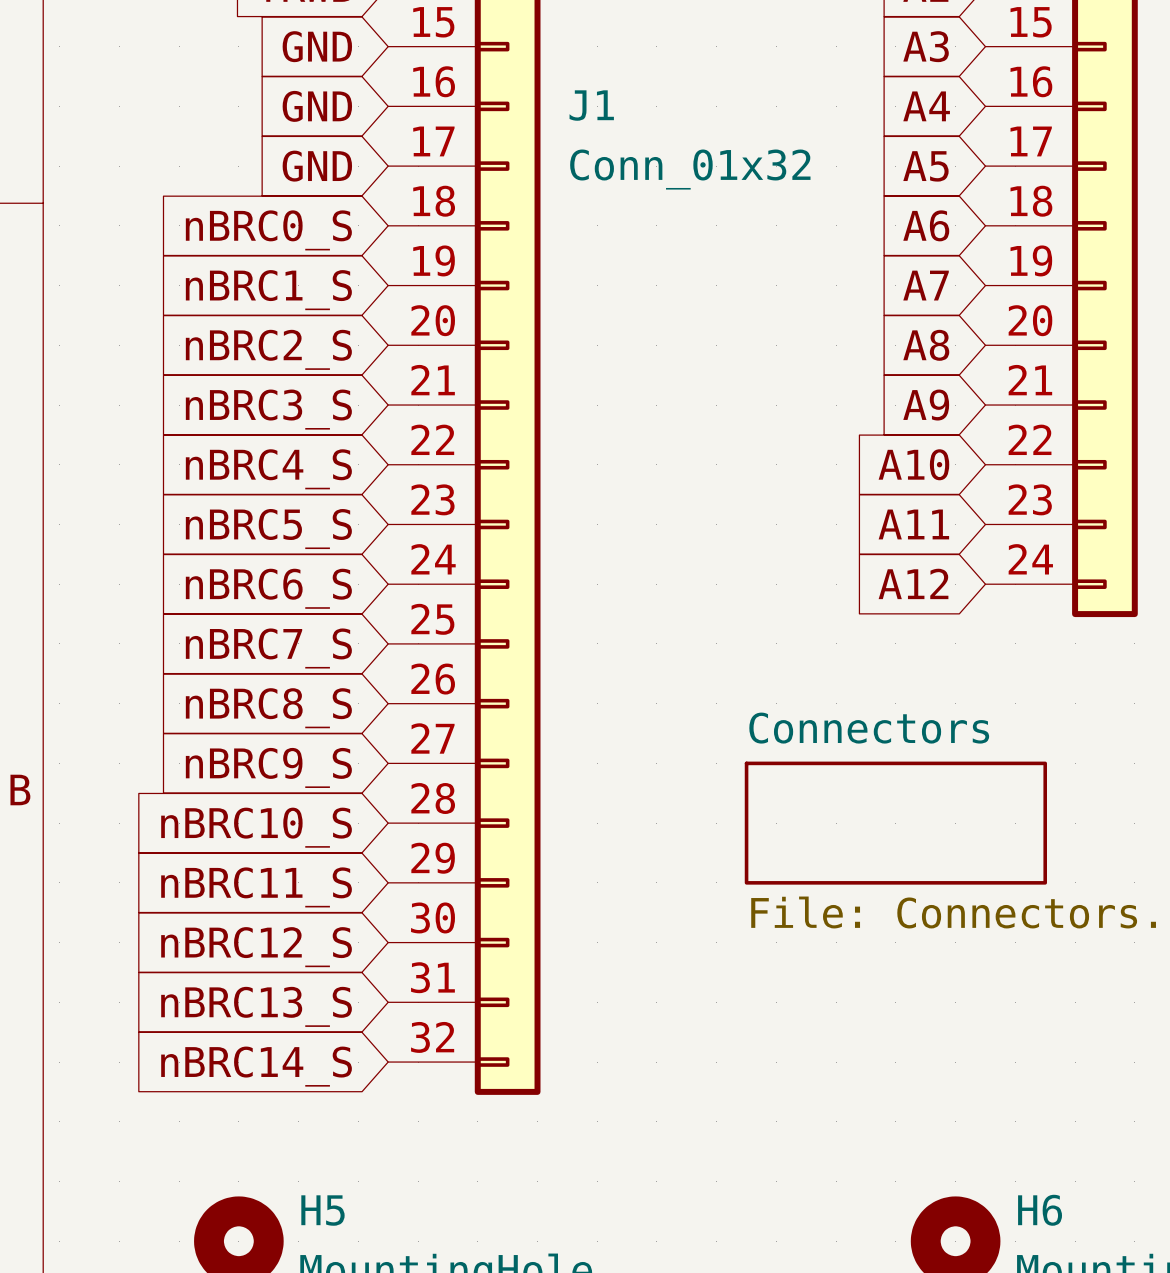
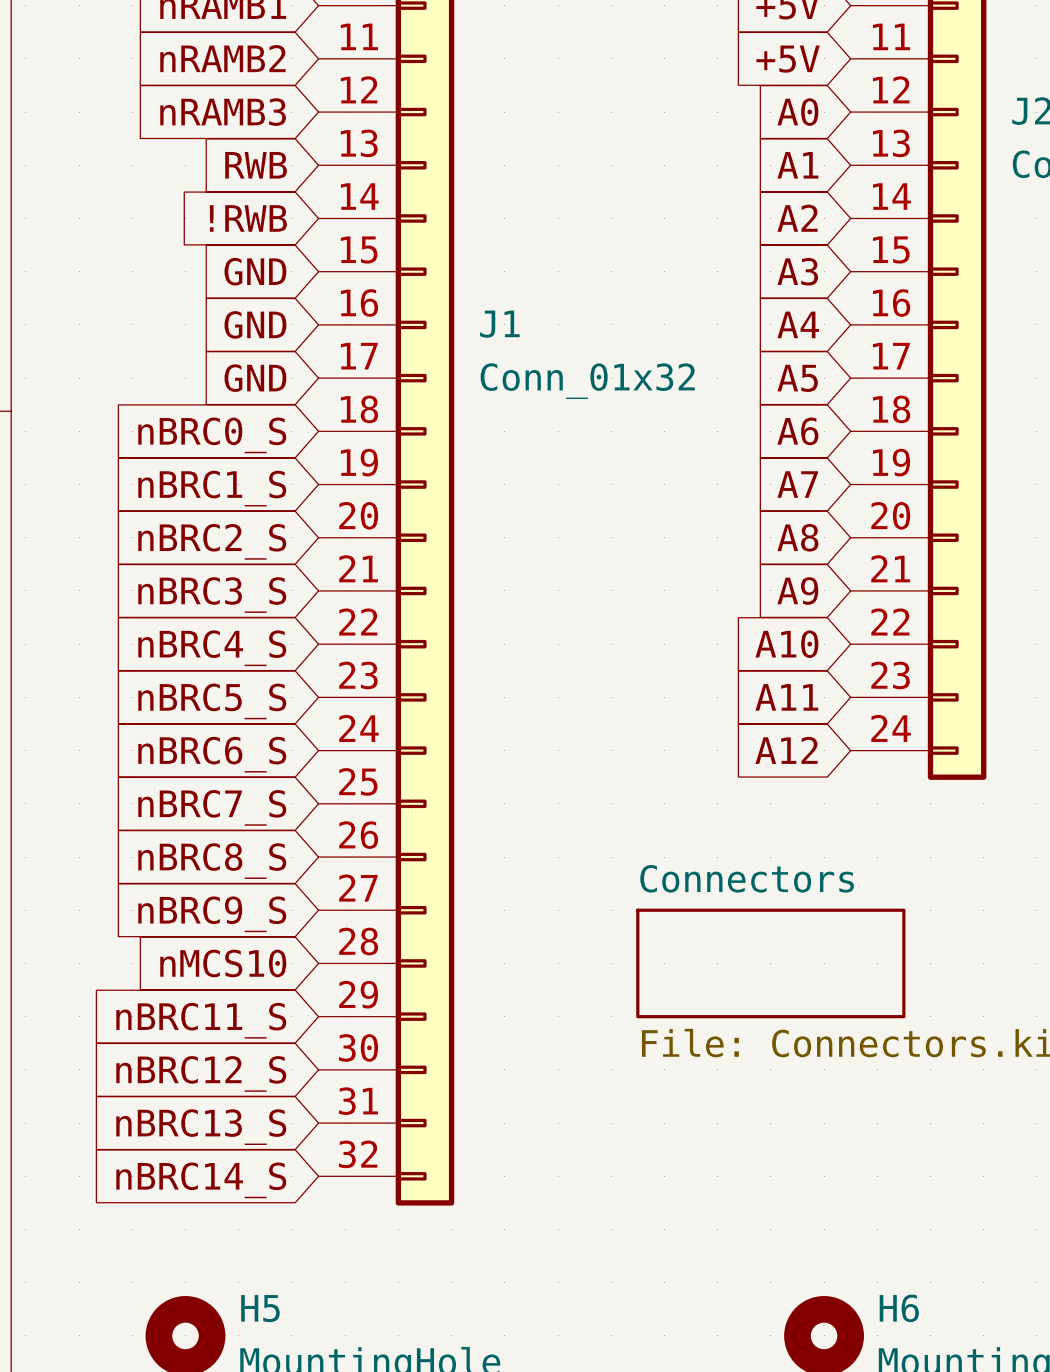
global label: nBRC10_S (256, 827) -> nMCS10 (223, 963)

